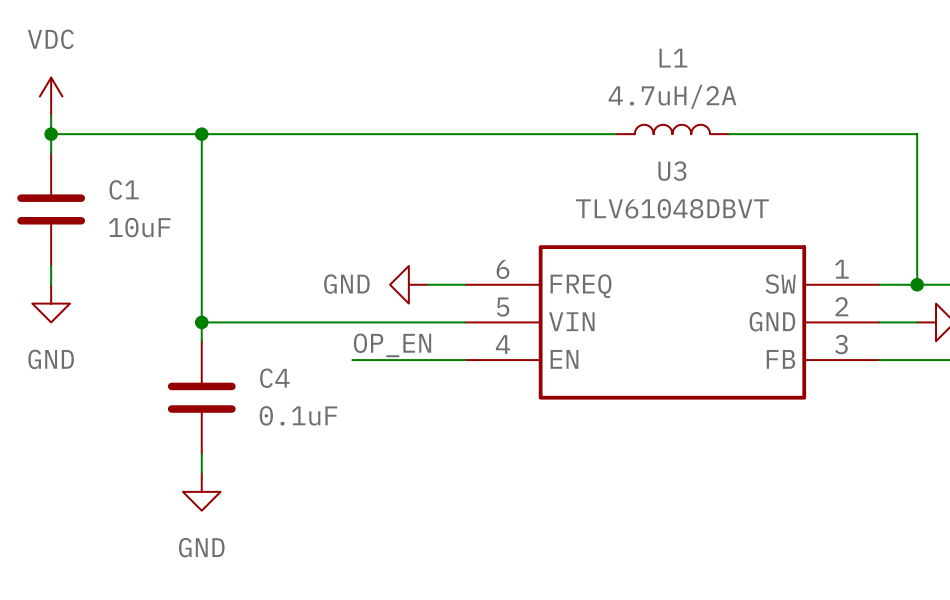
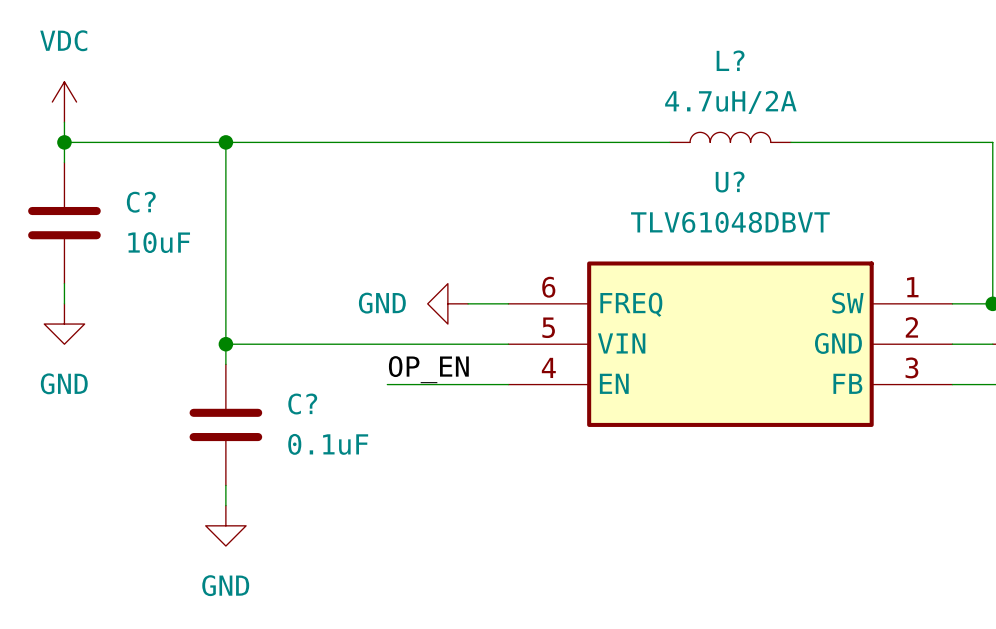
L1 name: L1 (673, 58) -> L? (730, 60)
U3 name: U3 (672, 171) -> U? (730, 182)
C1 name: C1 (124, 189) -> C? (141, 202)
C4 name: C4 (274, 378) -> C? (302, 404)

